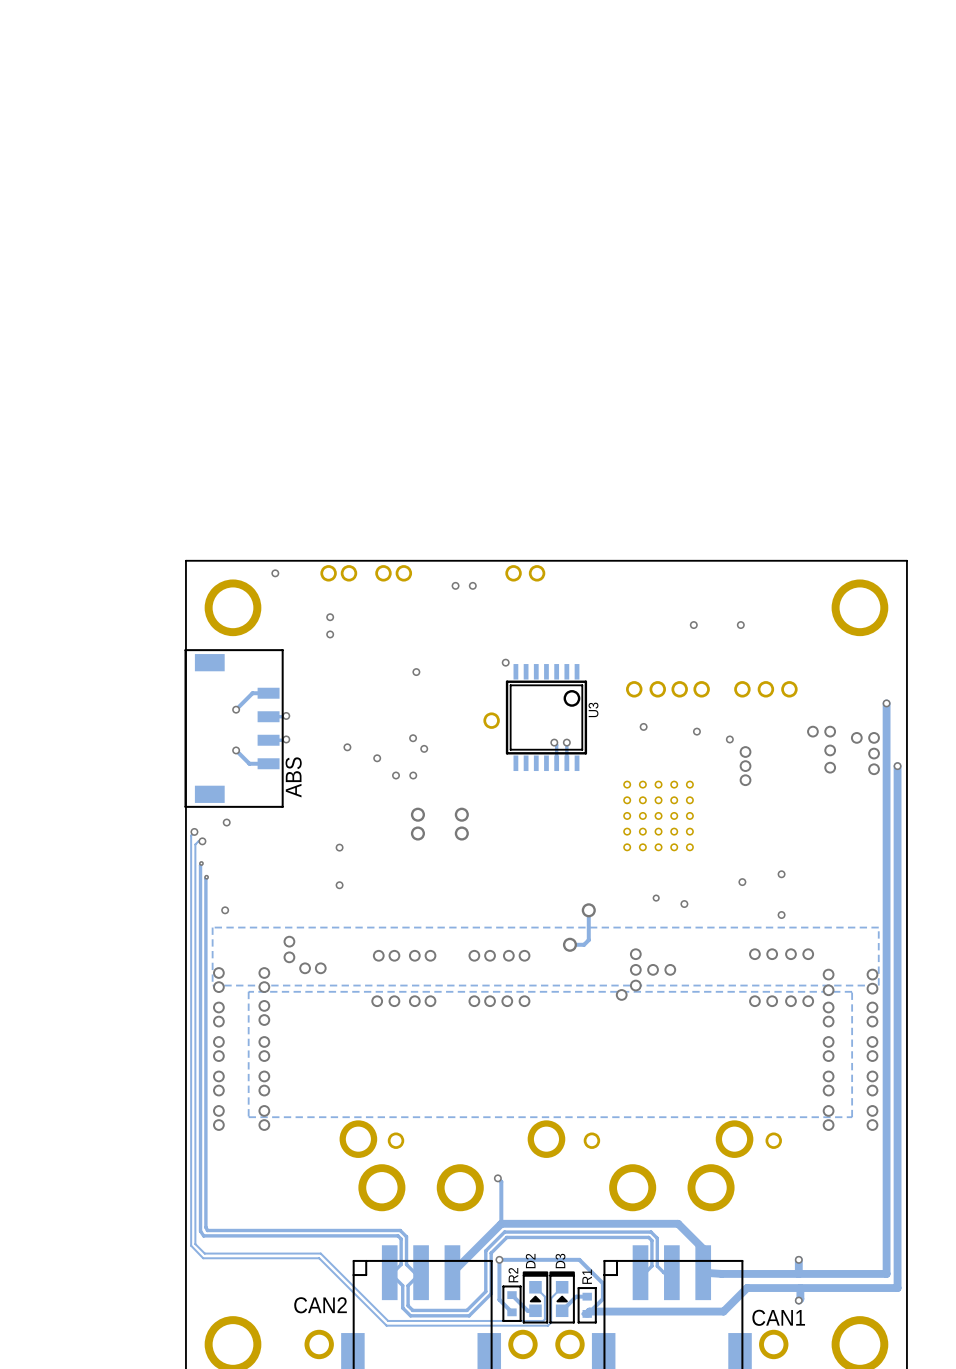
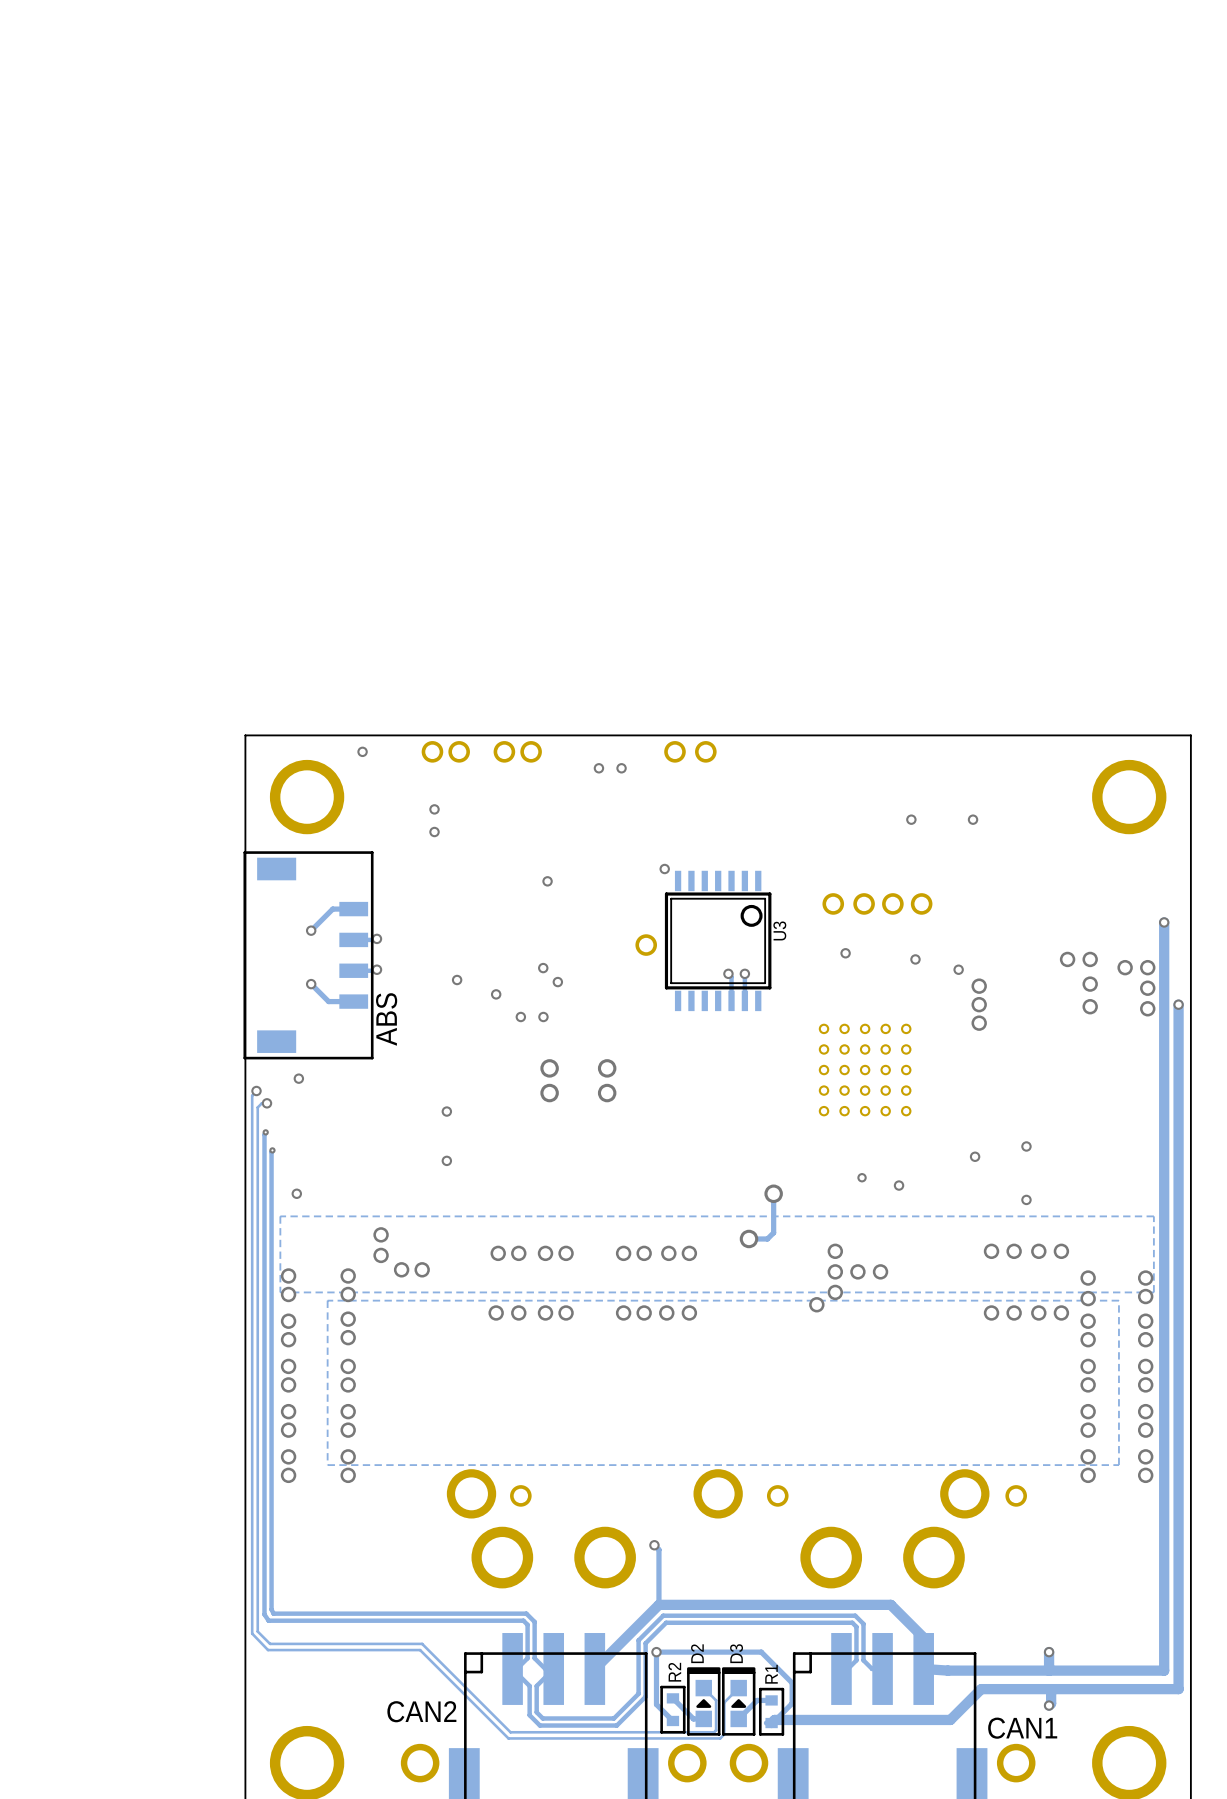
part: (742, 689) -> none
part: (765, 689) -> none
part: (789, 689) -> none

